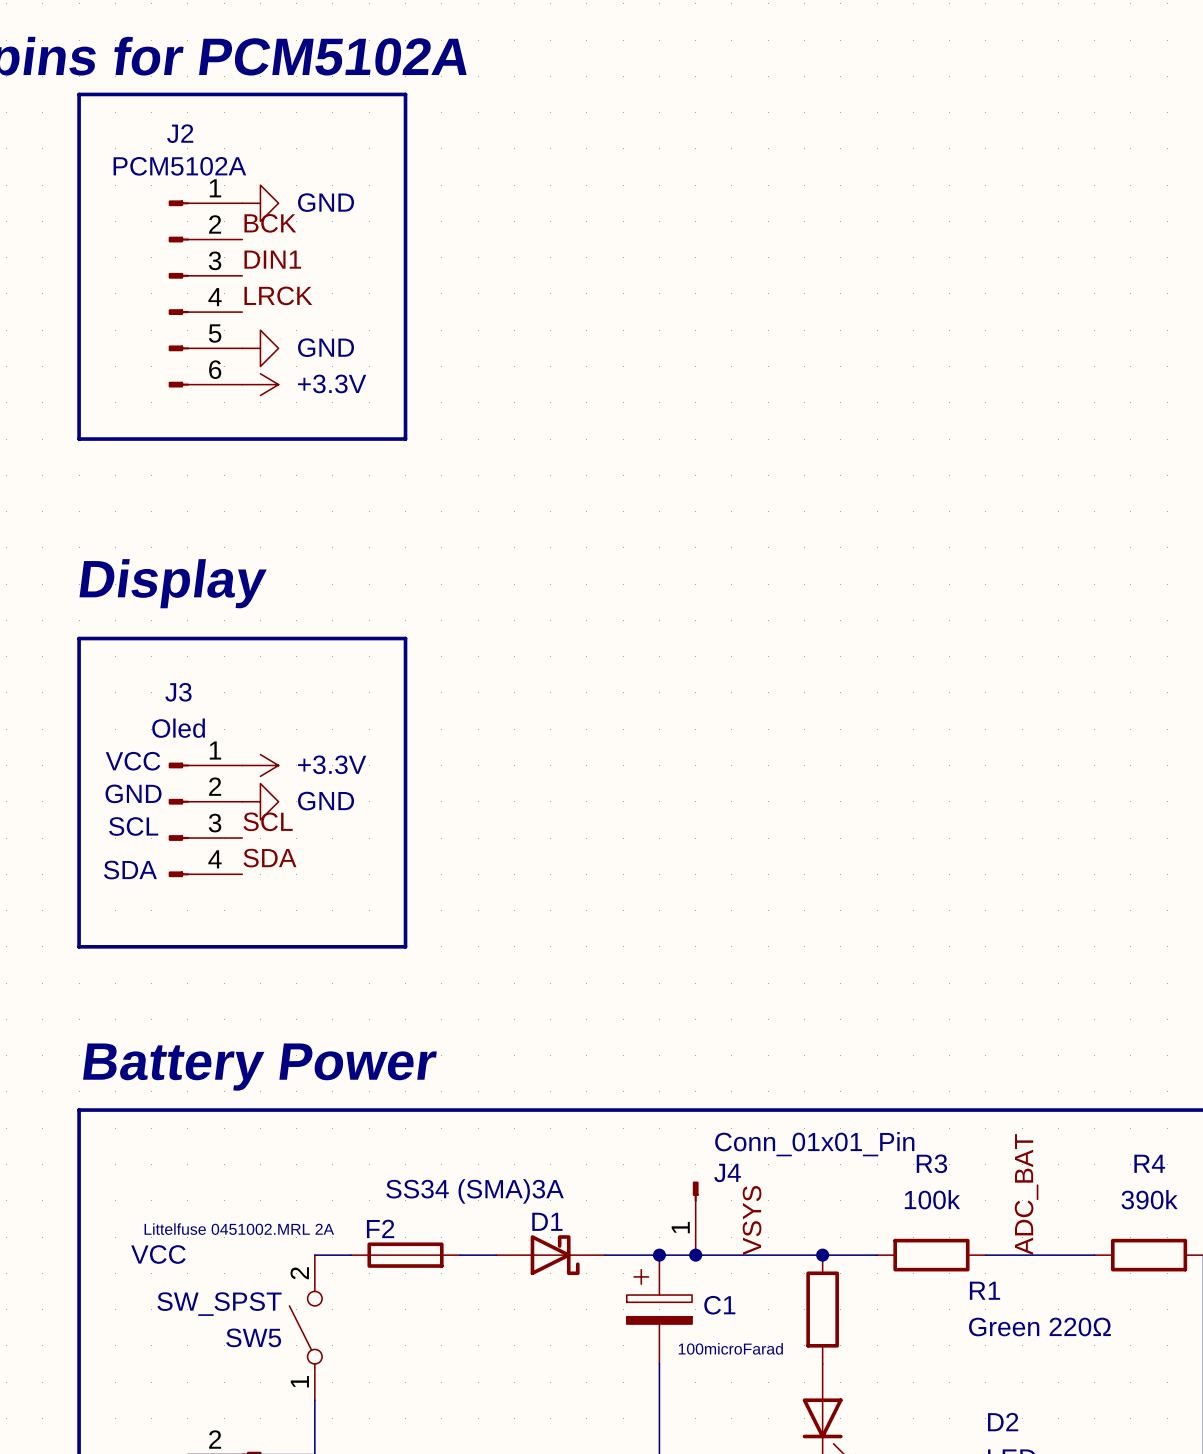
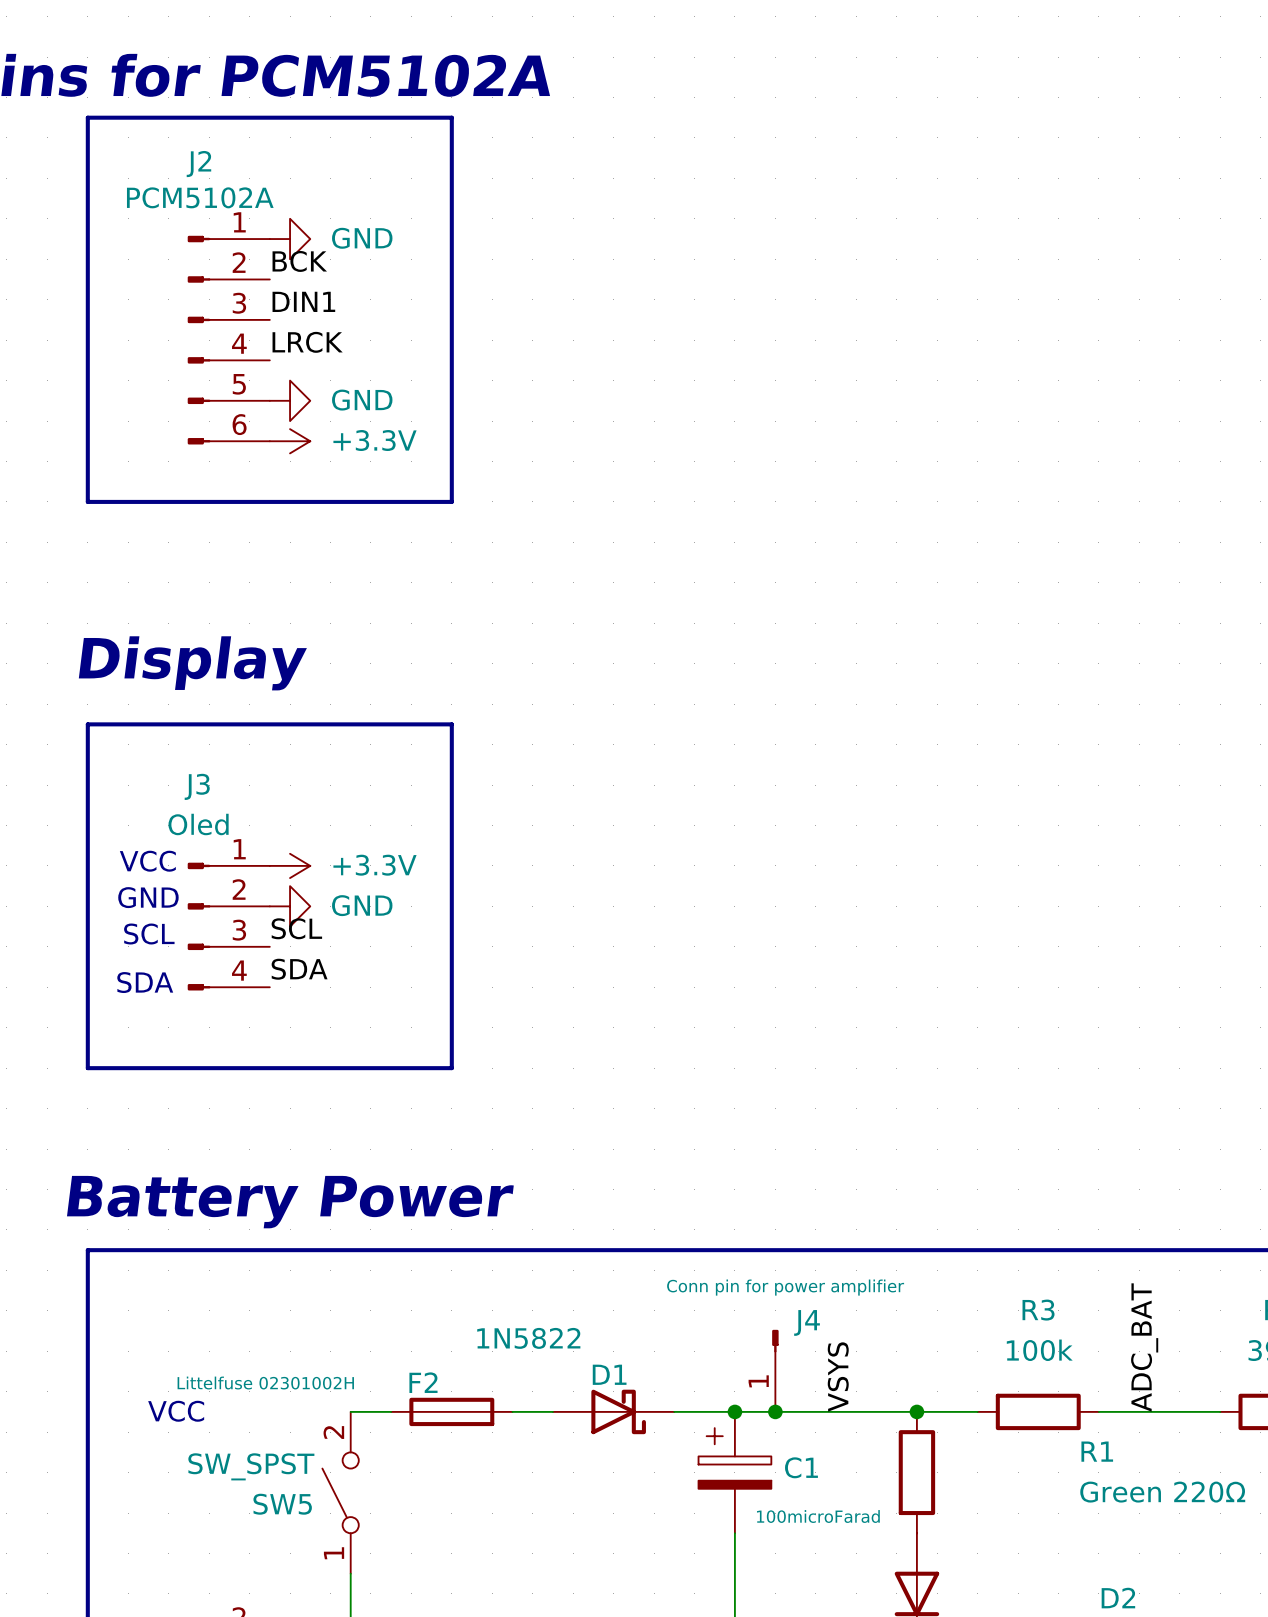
J4 value: Conn_01x01_Pin (814, 1144) -> Conn pin for power amplifier (785, 1287)
D1 value: SS34 (SMA)3A (475, 1191) -> 1N5822 (528, 1338)
F2 value: Littelfuse 0451002.MRL 2A (239, 1229) -> Littelfuse 02301002H (265, 1383)

